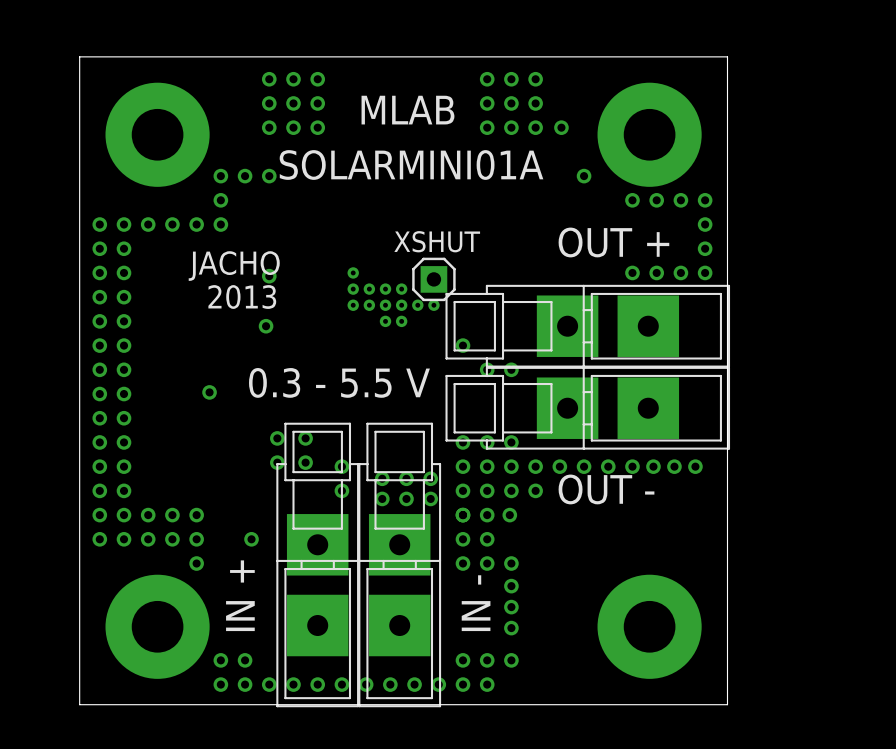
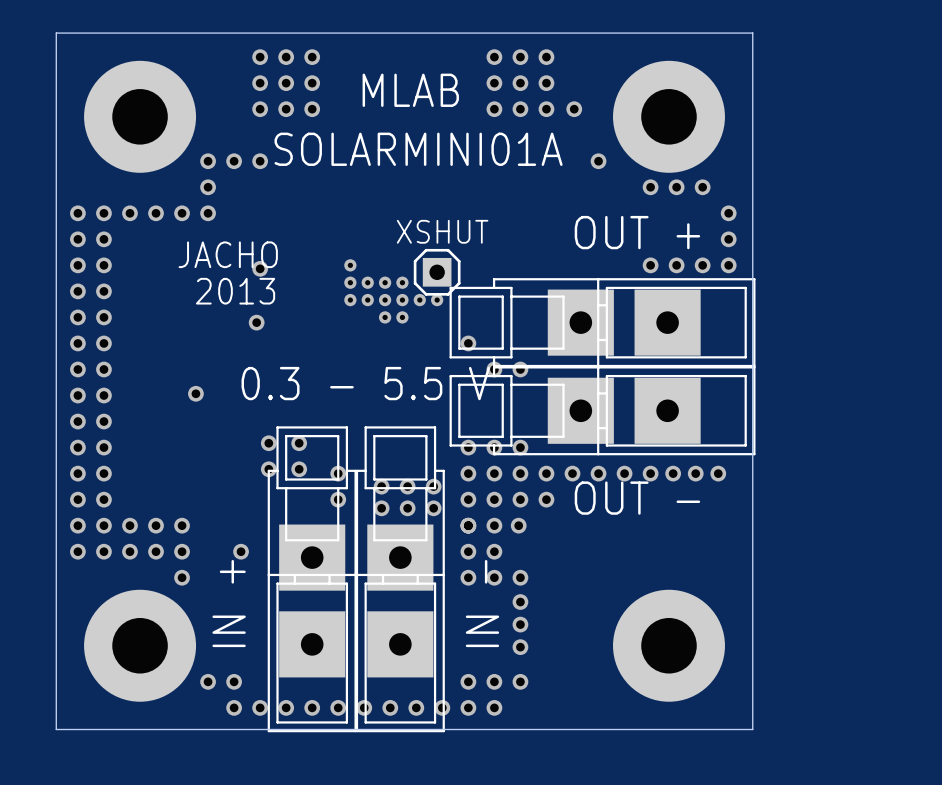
via: (705, 200) -> none
via: (220, 684) -> none

